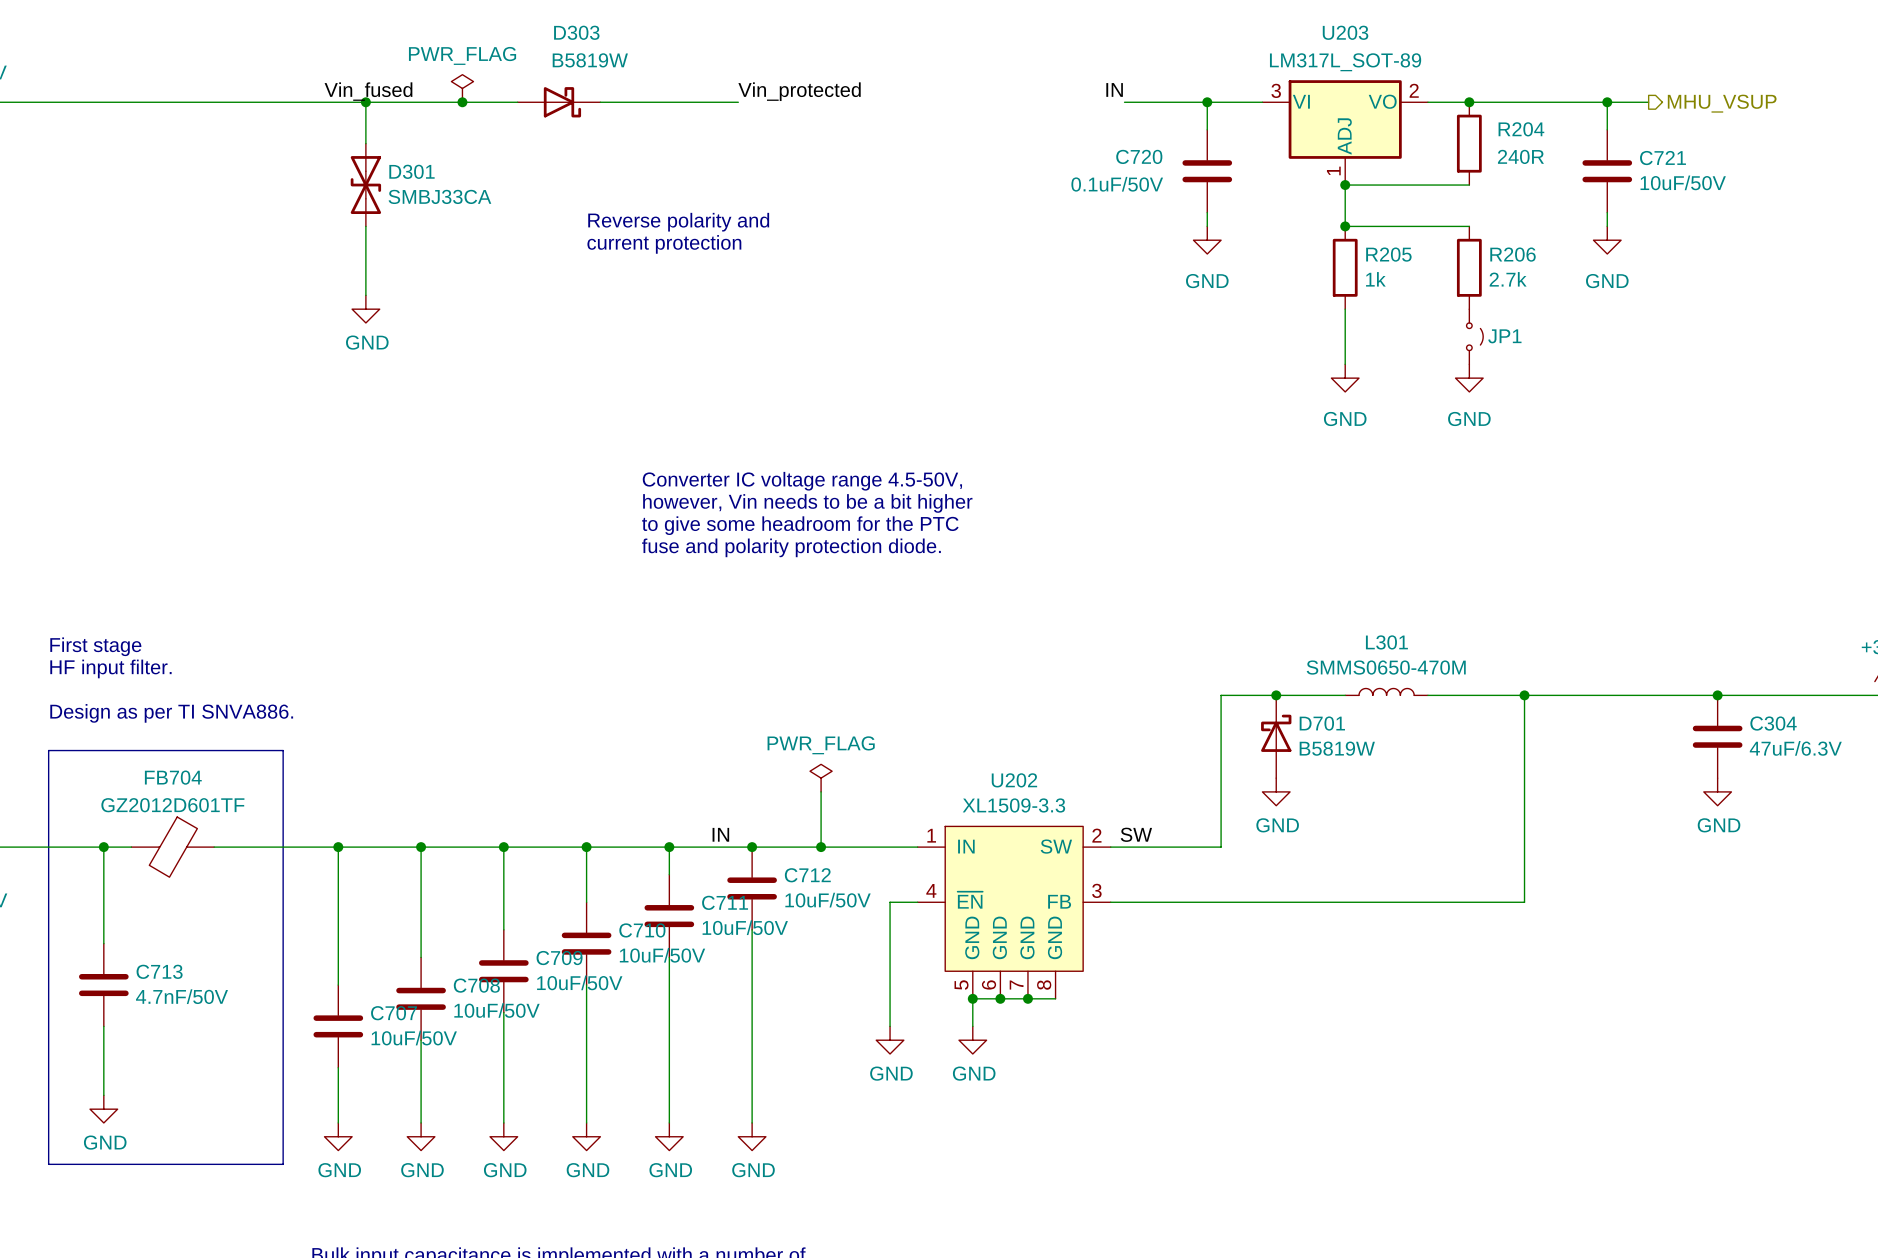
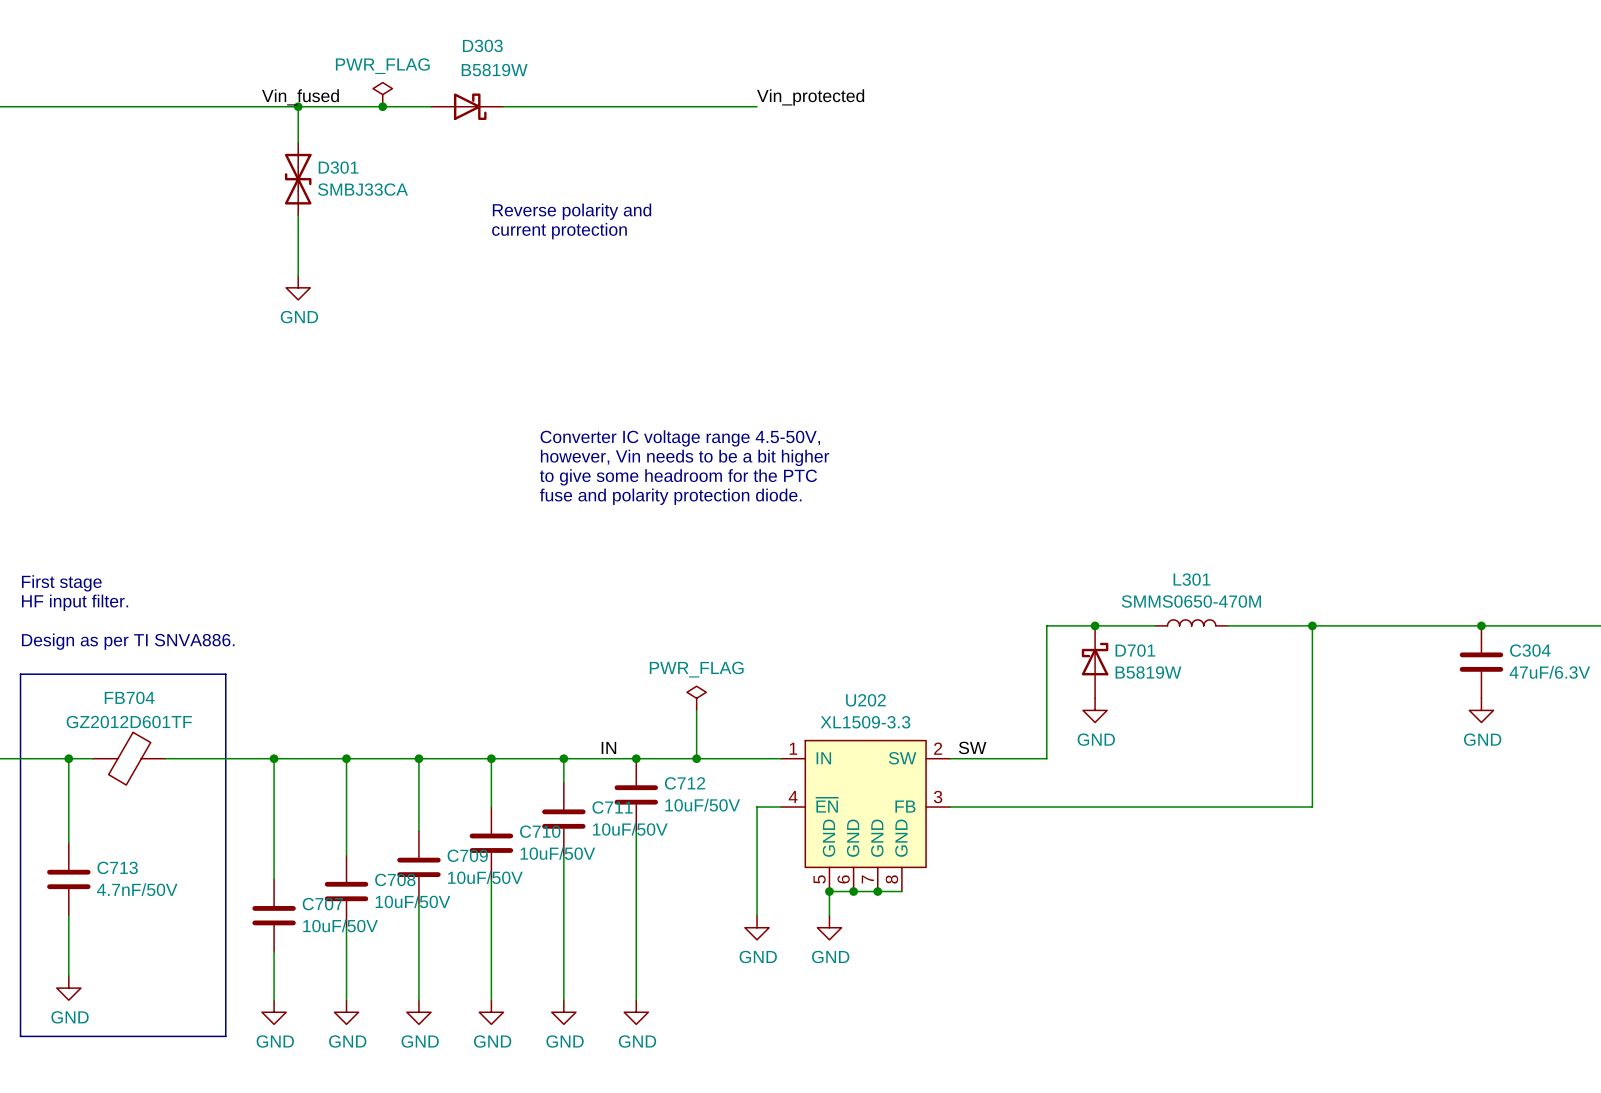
label: IN (1114, 89) -> none
label position: Vin_protected (799, 91) -> Vin_protected (810, 97)
wire: none -> (624, 106) (757, 106)
wire: (1124, 102) (1262, 102) -> none
wire: (1207, 102) (1207, 129) -> none
junction: (1207, 102) -> none
wire: (1427, 102) (1648, 102) -> none
junction: (1469, 102) -> none
wire: (1607, 102) (1607, 129) -> none
junction: (1607, 102) -> none
hierarchical label: MHU_VSUP (1722, 103) -> none
U203: LM317L_SOT-89 (1345, 132) -> none
R204: 240R (1469, 143) -> none
C720: 0.1uF/50V (1207, 171) -> none
C721: 10uF/50V (1607, 171) -> none
junction: (1345, 185) -> none
wire: (1469, 185) (1345, 185) (1345, 226) (1469, 226) -> none
wire: (1207, 212) (1207, 226) -> none
wire: (1607, 212) (1607, 226) -> none
junction: (1345, 226) -> none
power symbol: GND (1207, 240) -> none
power symbol: GND (1607, 240) -> none
R205: 1k (1345, 267) -> none
R206: 2.7k (1469, 267) -> none
wire: (1345, 309) (1345, 364) -> none
JP1: (1474, 336) -> none
power symbol: GND (1345, 378) -> none
power symbol: GND (1469, 378) -> none

